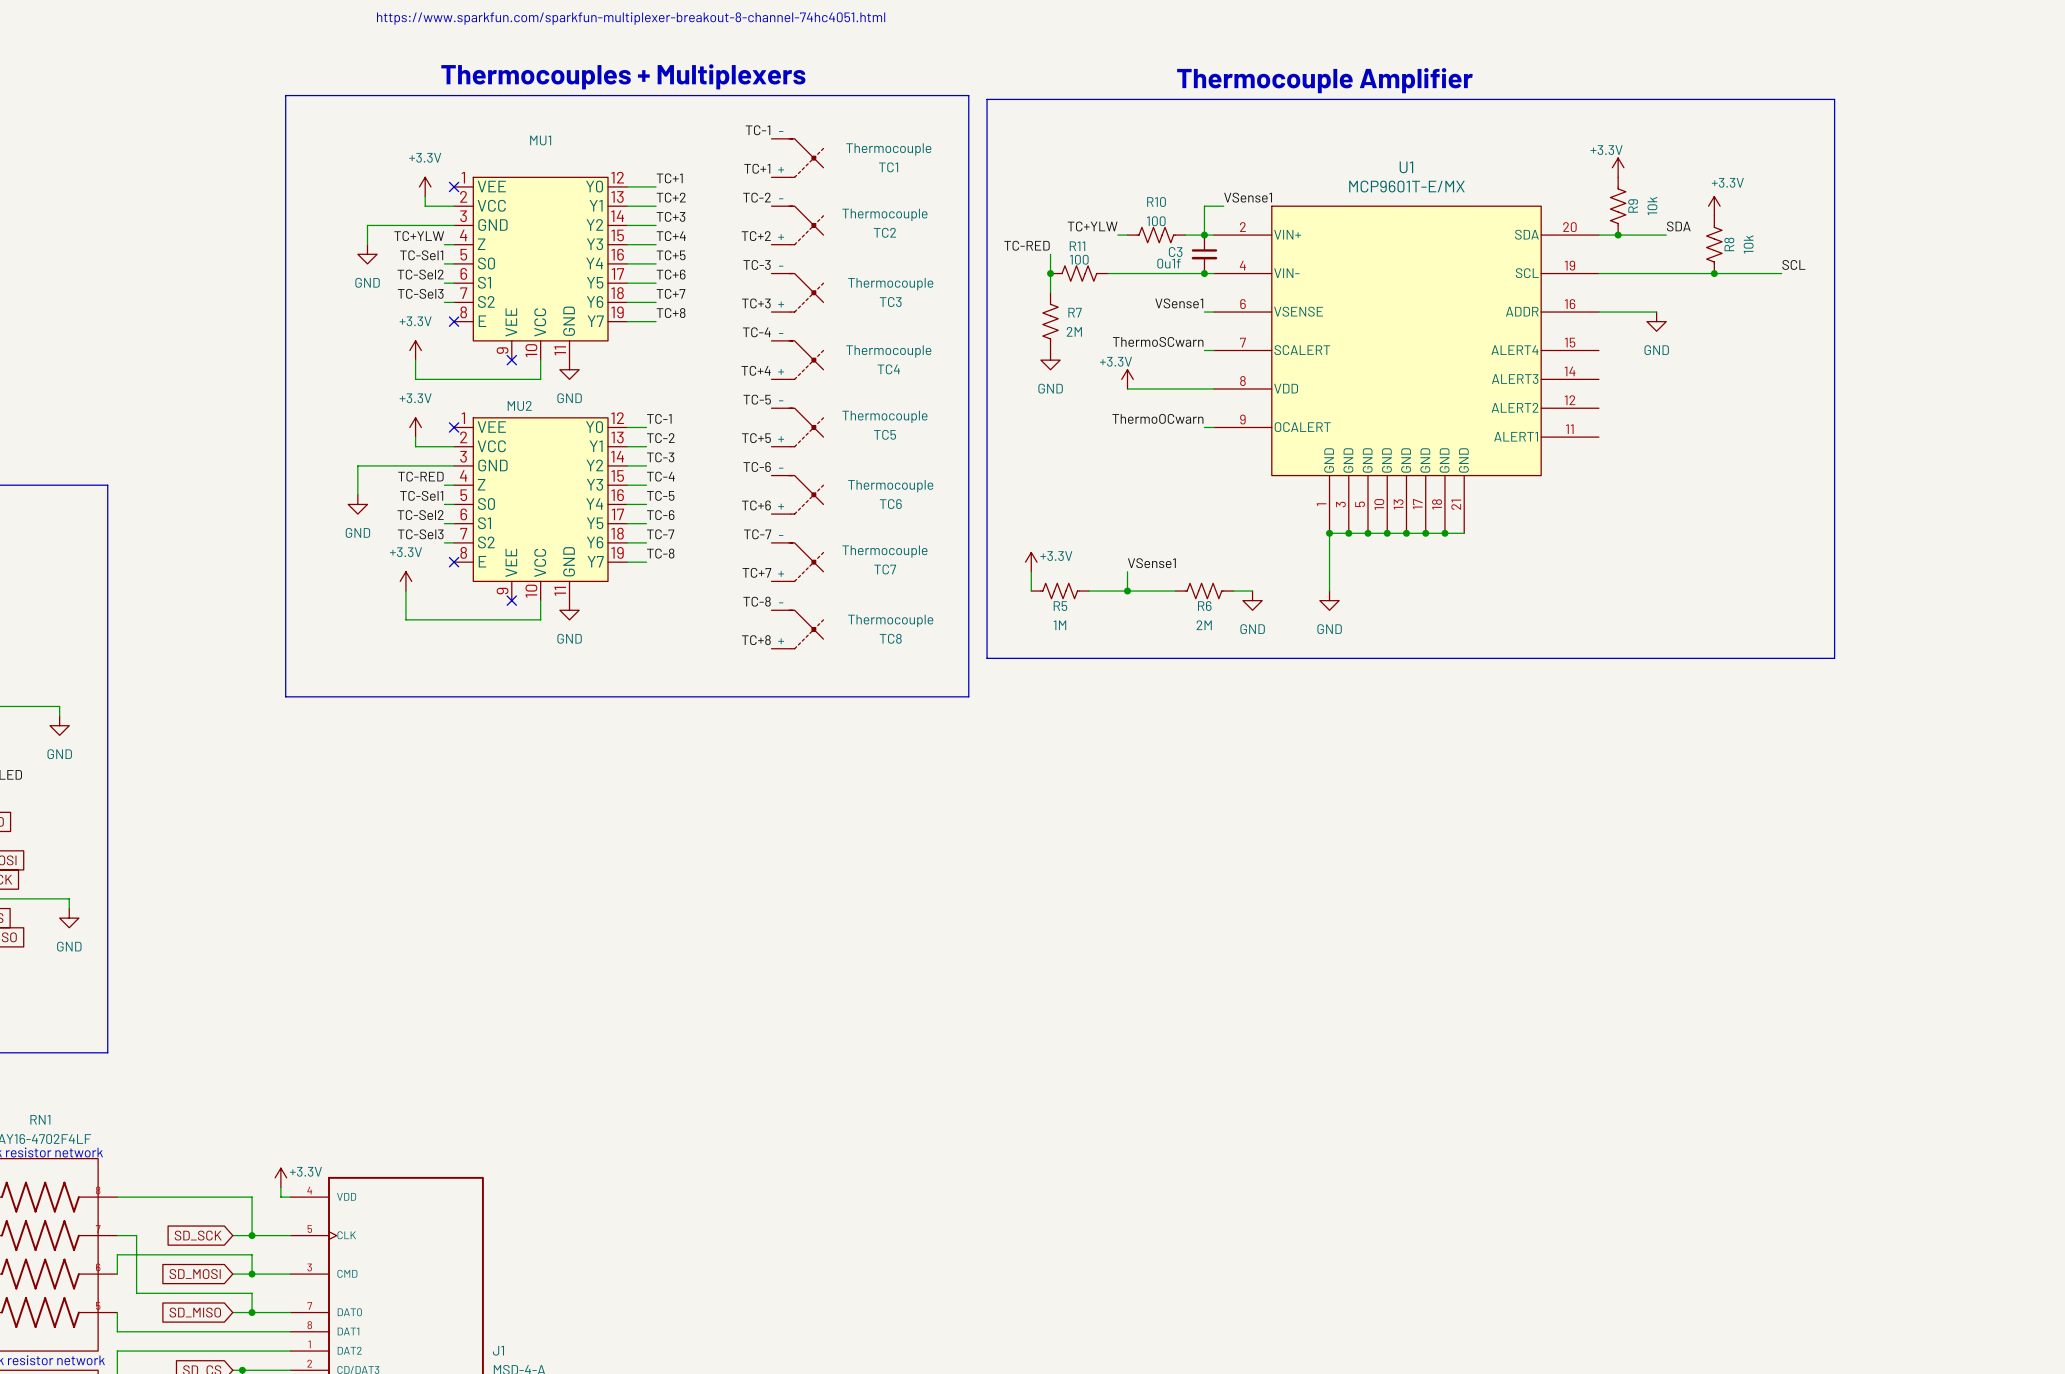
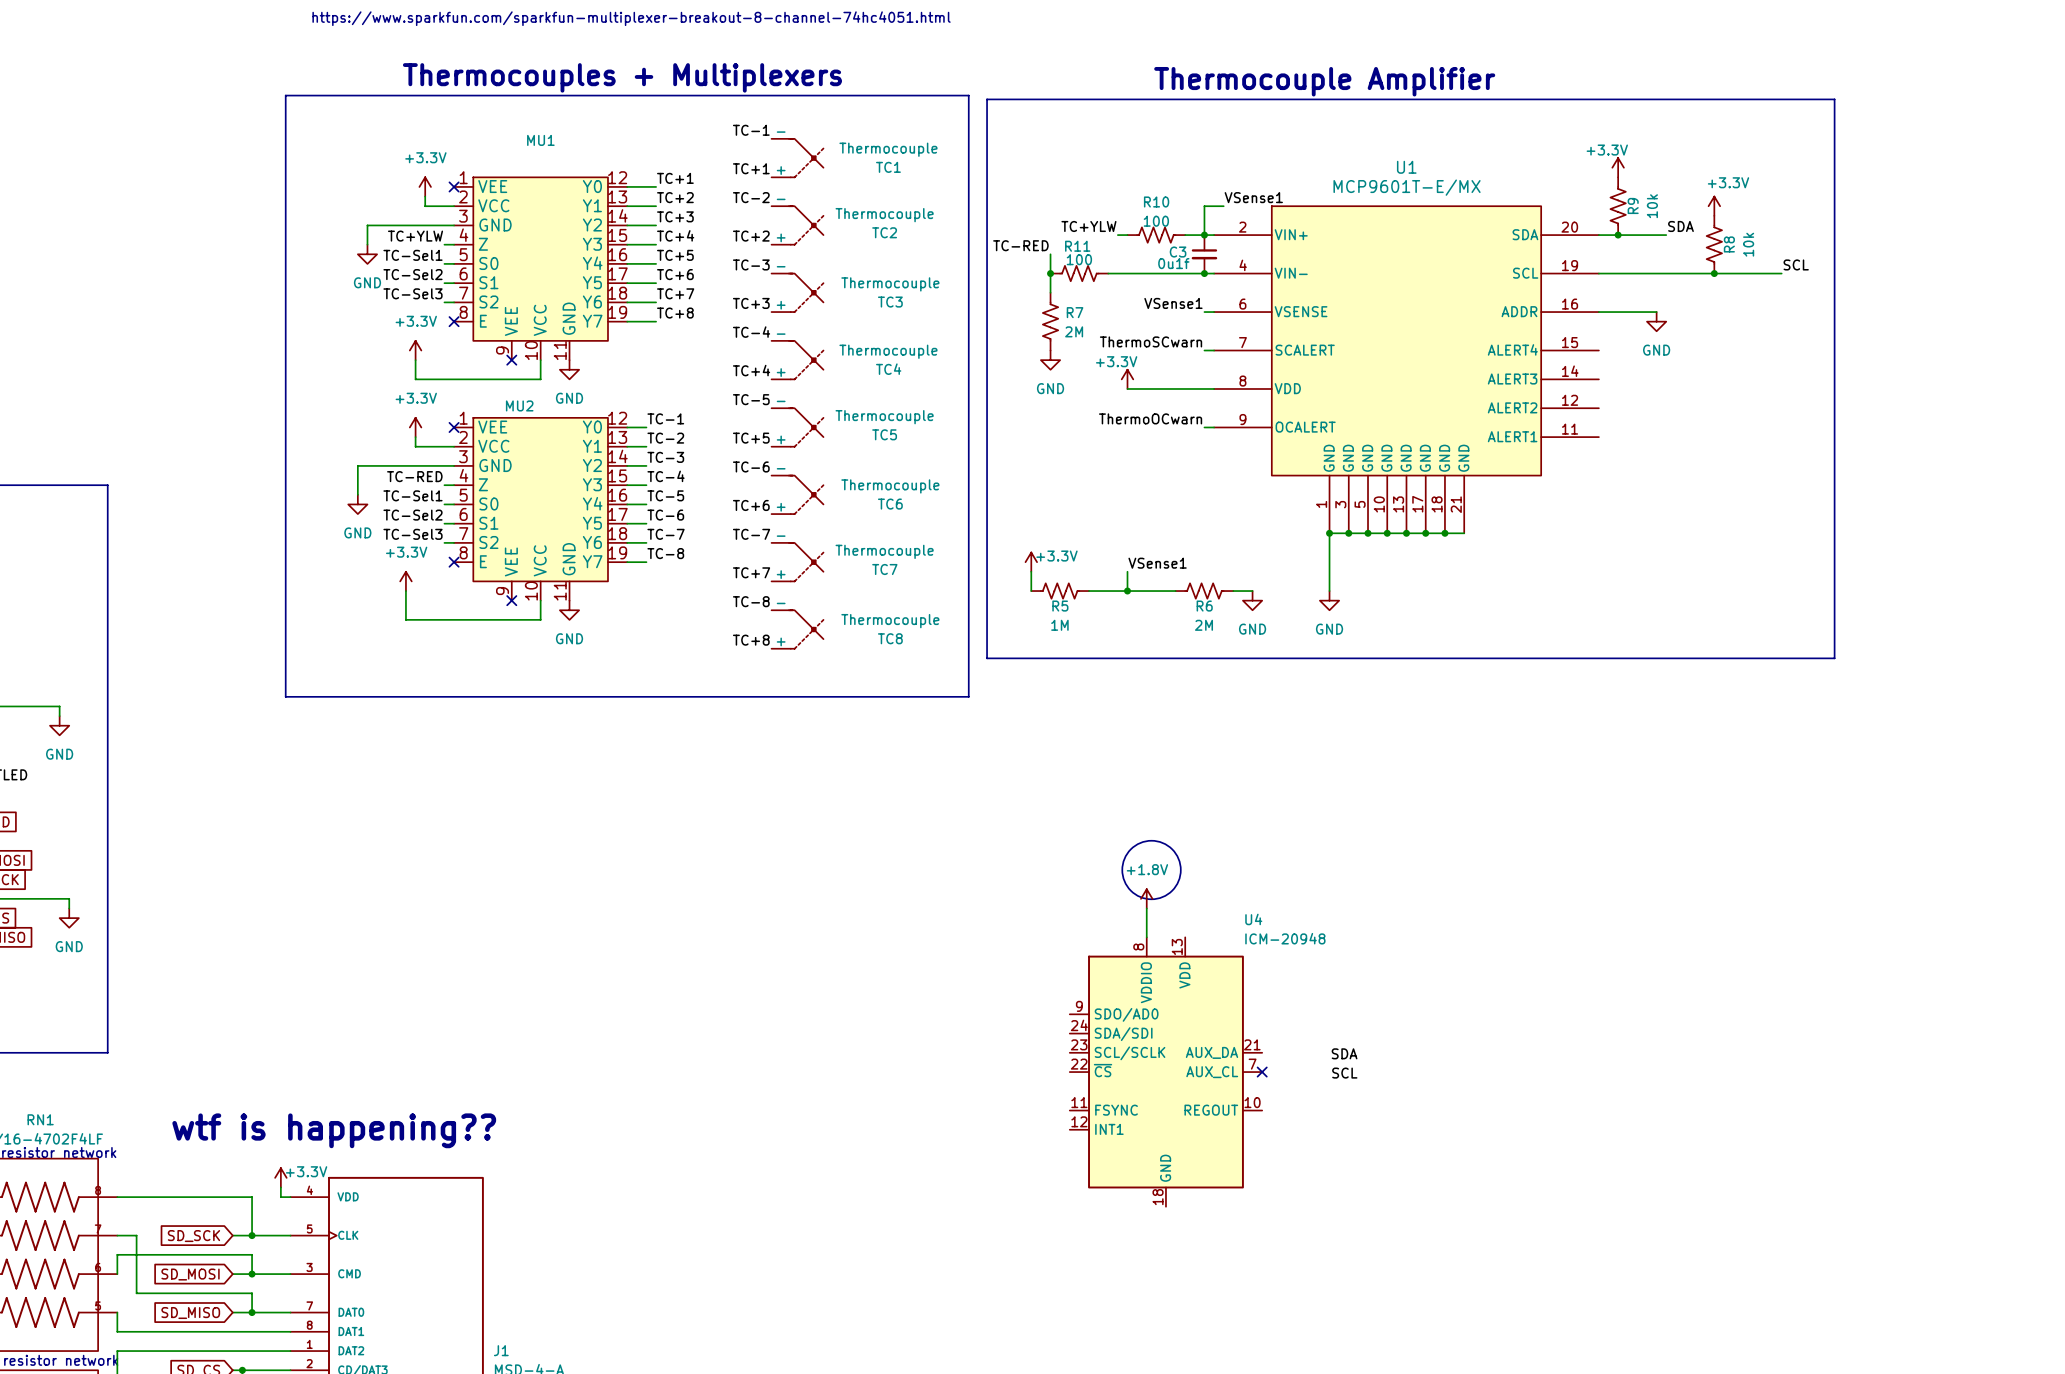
drawing: none -> [1122, 840, 1181, 900]
power symbol: none -> +1.8V (1146, 898)
wire: none -> (1146, 908) (1146, 937)
label: none -> SDA (1344, 1053)
U4: none -> ICM-20948 (1165, 1072)
no-connect mark: none -> (1262, 1072)
label: none -> SCL (1344, 1073)
text: none -> wtf is happening?? (334, 1130)

